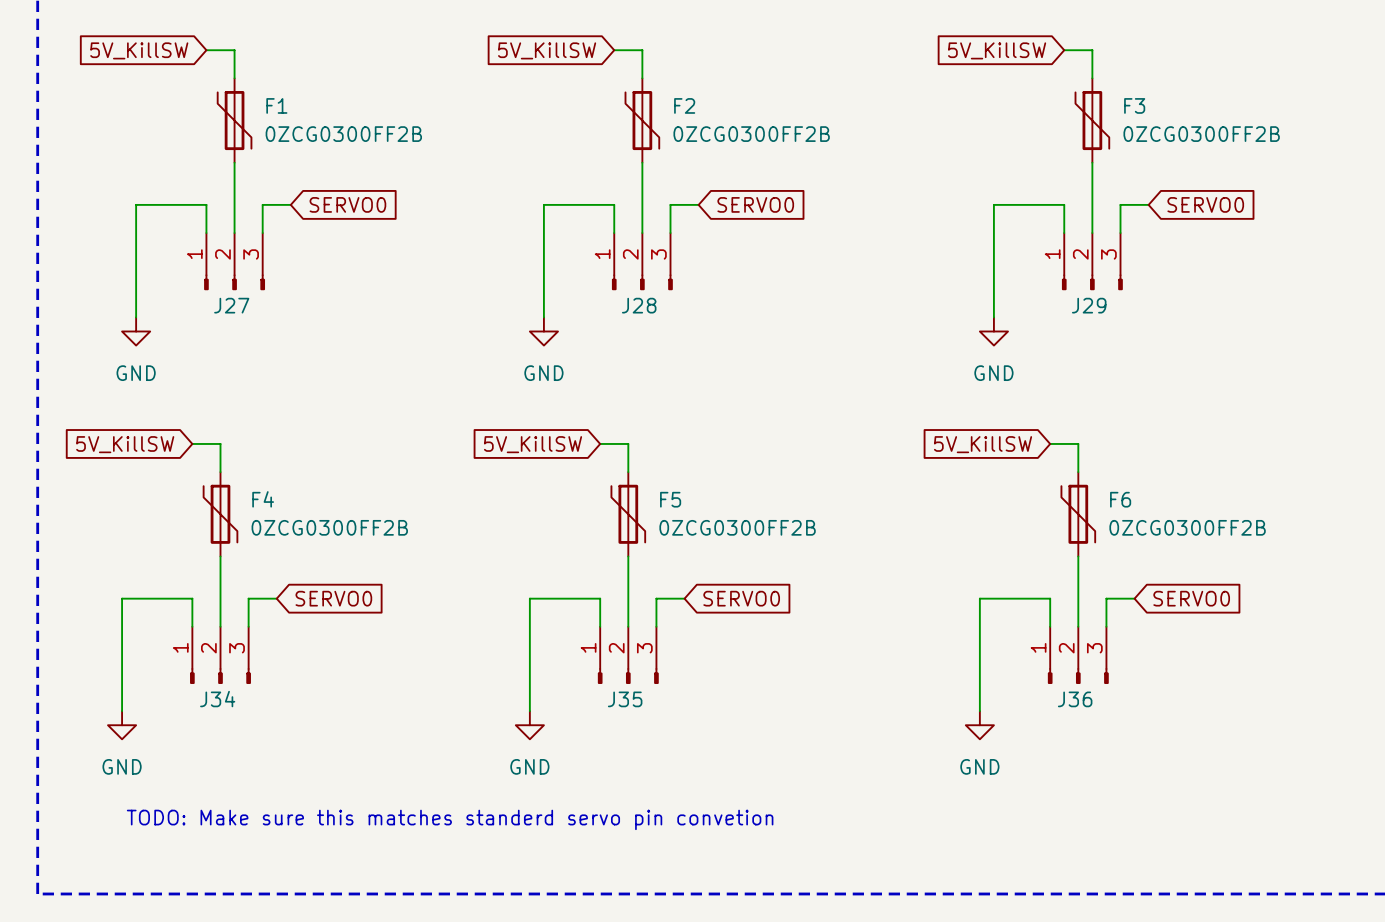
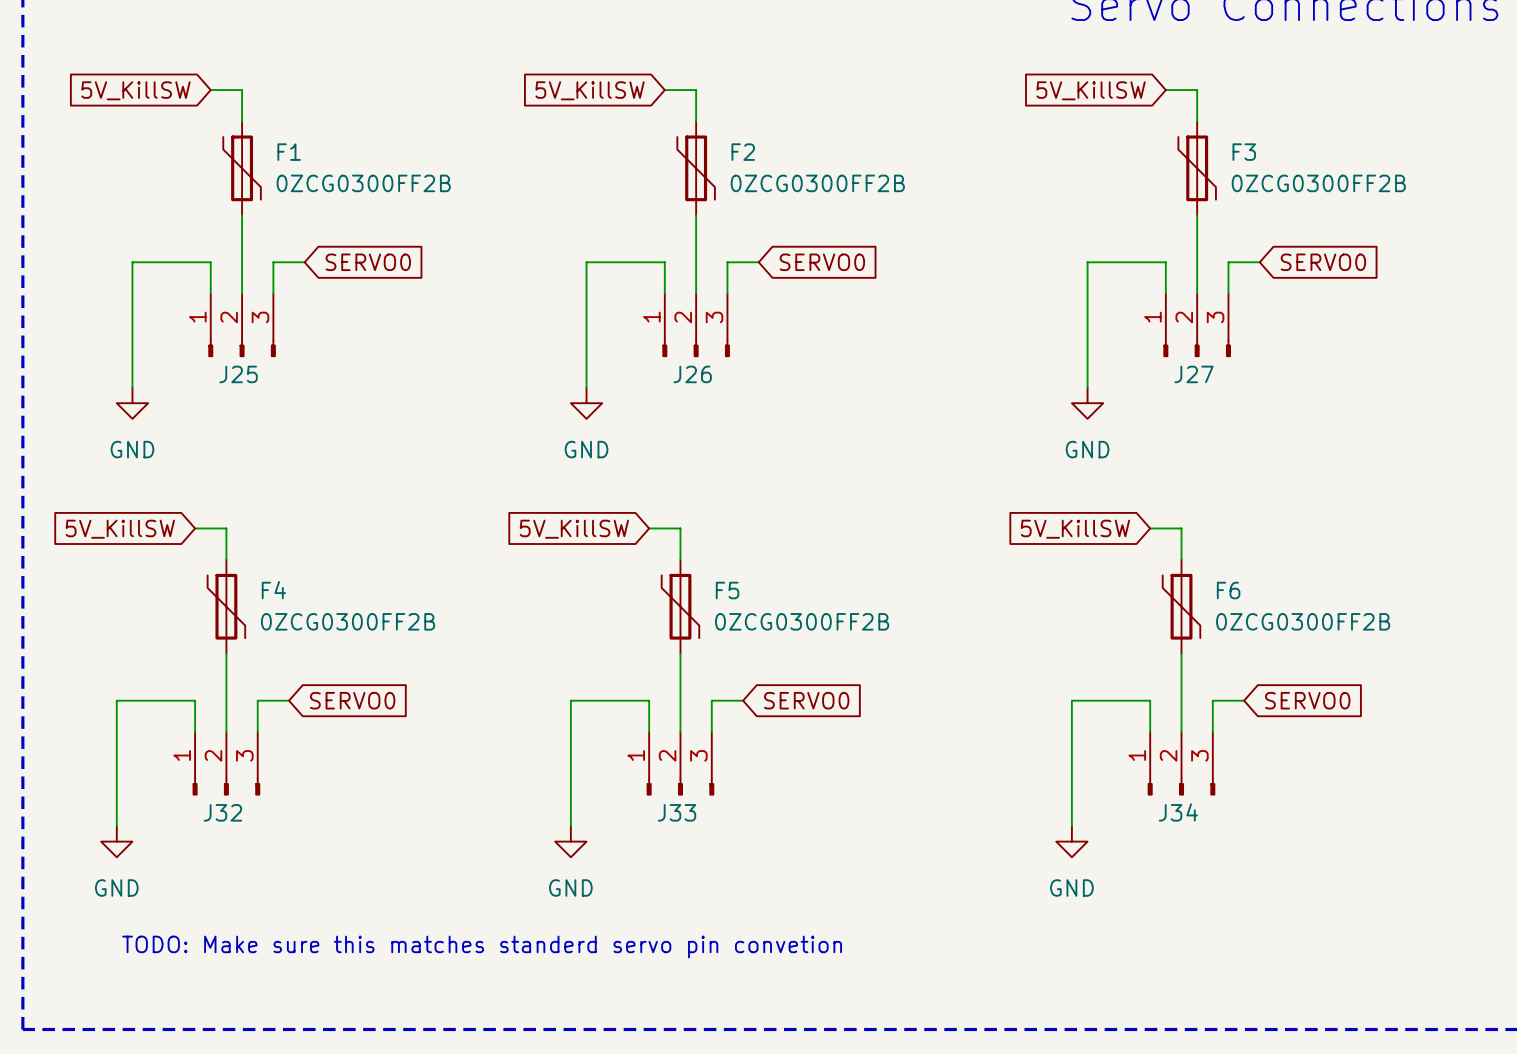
J27 name: J27 (231, 305) -> J25 (238, 374)
J28 name: J28 (639, 305) -> J26 (692, 374)
J29 name: J29 (1089, 305) -> J27 (1194, 374)
J34 name: J34 (217, 699) -> J32 (222, 812)
J35 name: J35 (625, 699) -> J33 (676, 812)
J36 name: J36 (1075, 699) -> J34 (1178, 812)

